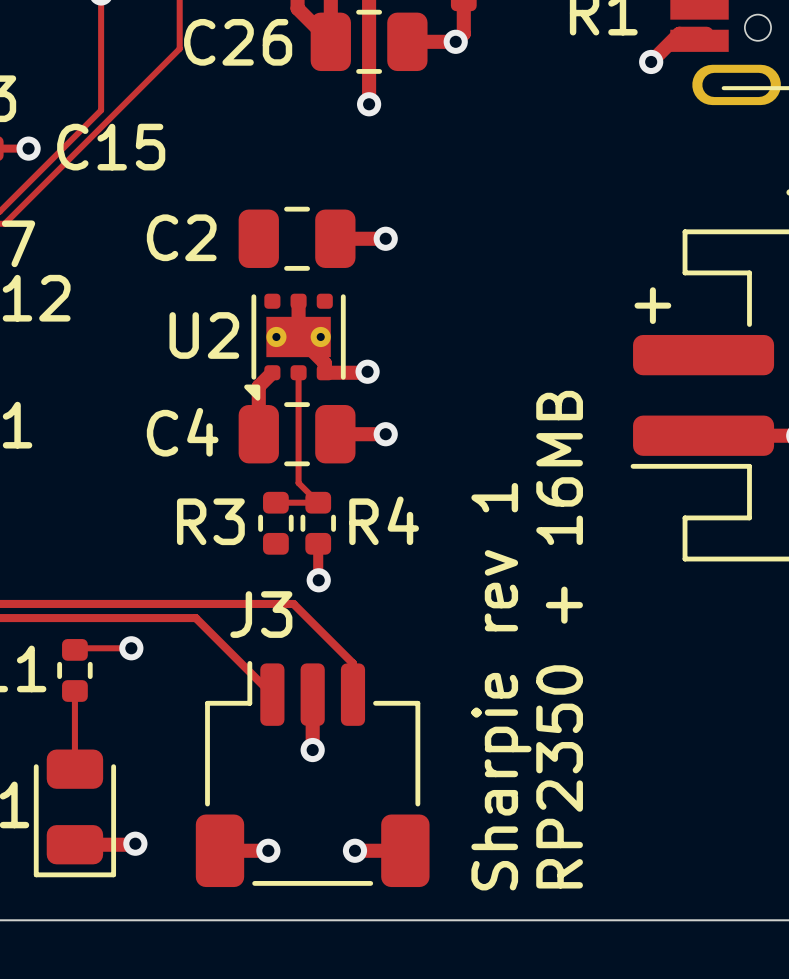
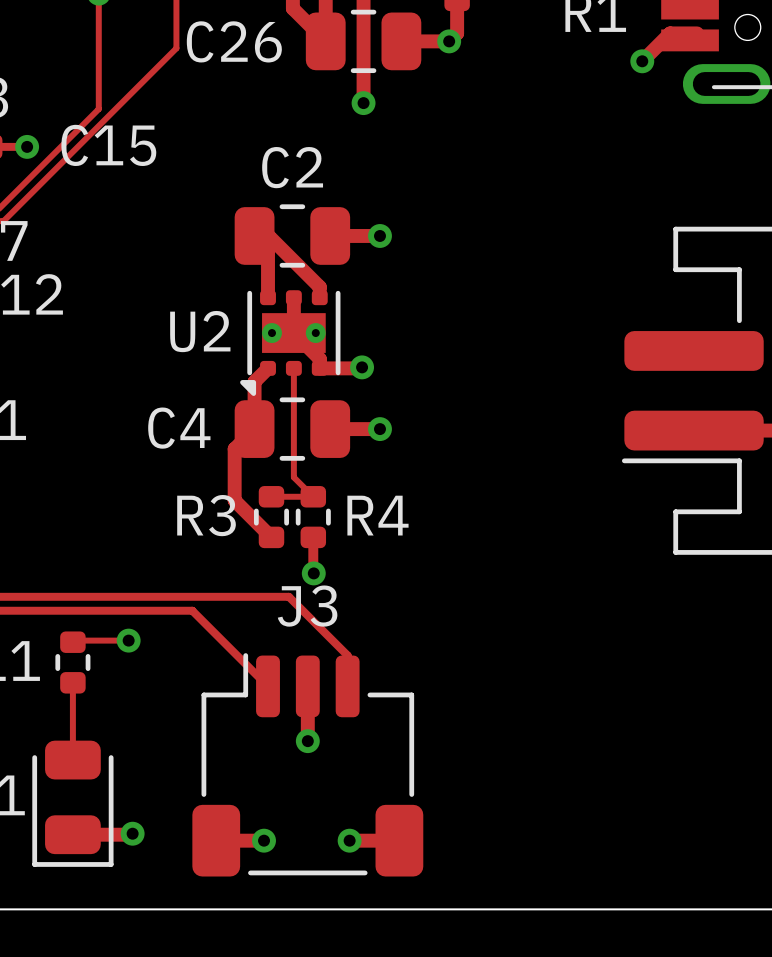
C2 name position: C2 (181, 237) -> C2 (292, 167)
track: none -> (268, 297) (268, 249) (254, 235) (268, 235) (319, 287) (319, 297)
text: + (652, 305) -> none
track: none -> (254, 429) (234, 448) (234, 500) (271, 537)
J3 name position: J3 (261, 614) -> J3 (307, 606)
text: RP2350 + 16MB (559, 639) -> none
text: Sharpie rev 1 (501, 686) -> none

